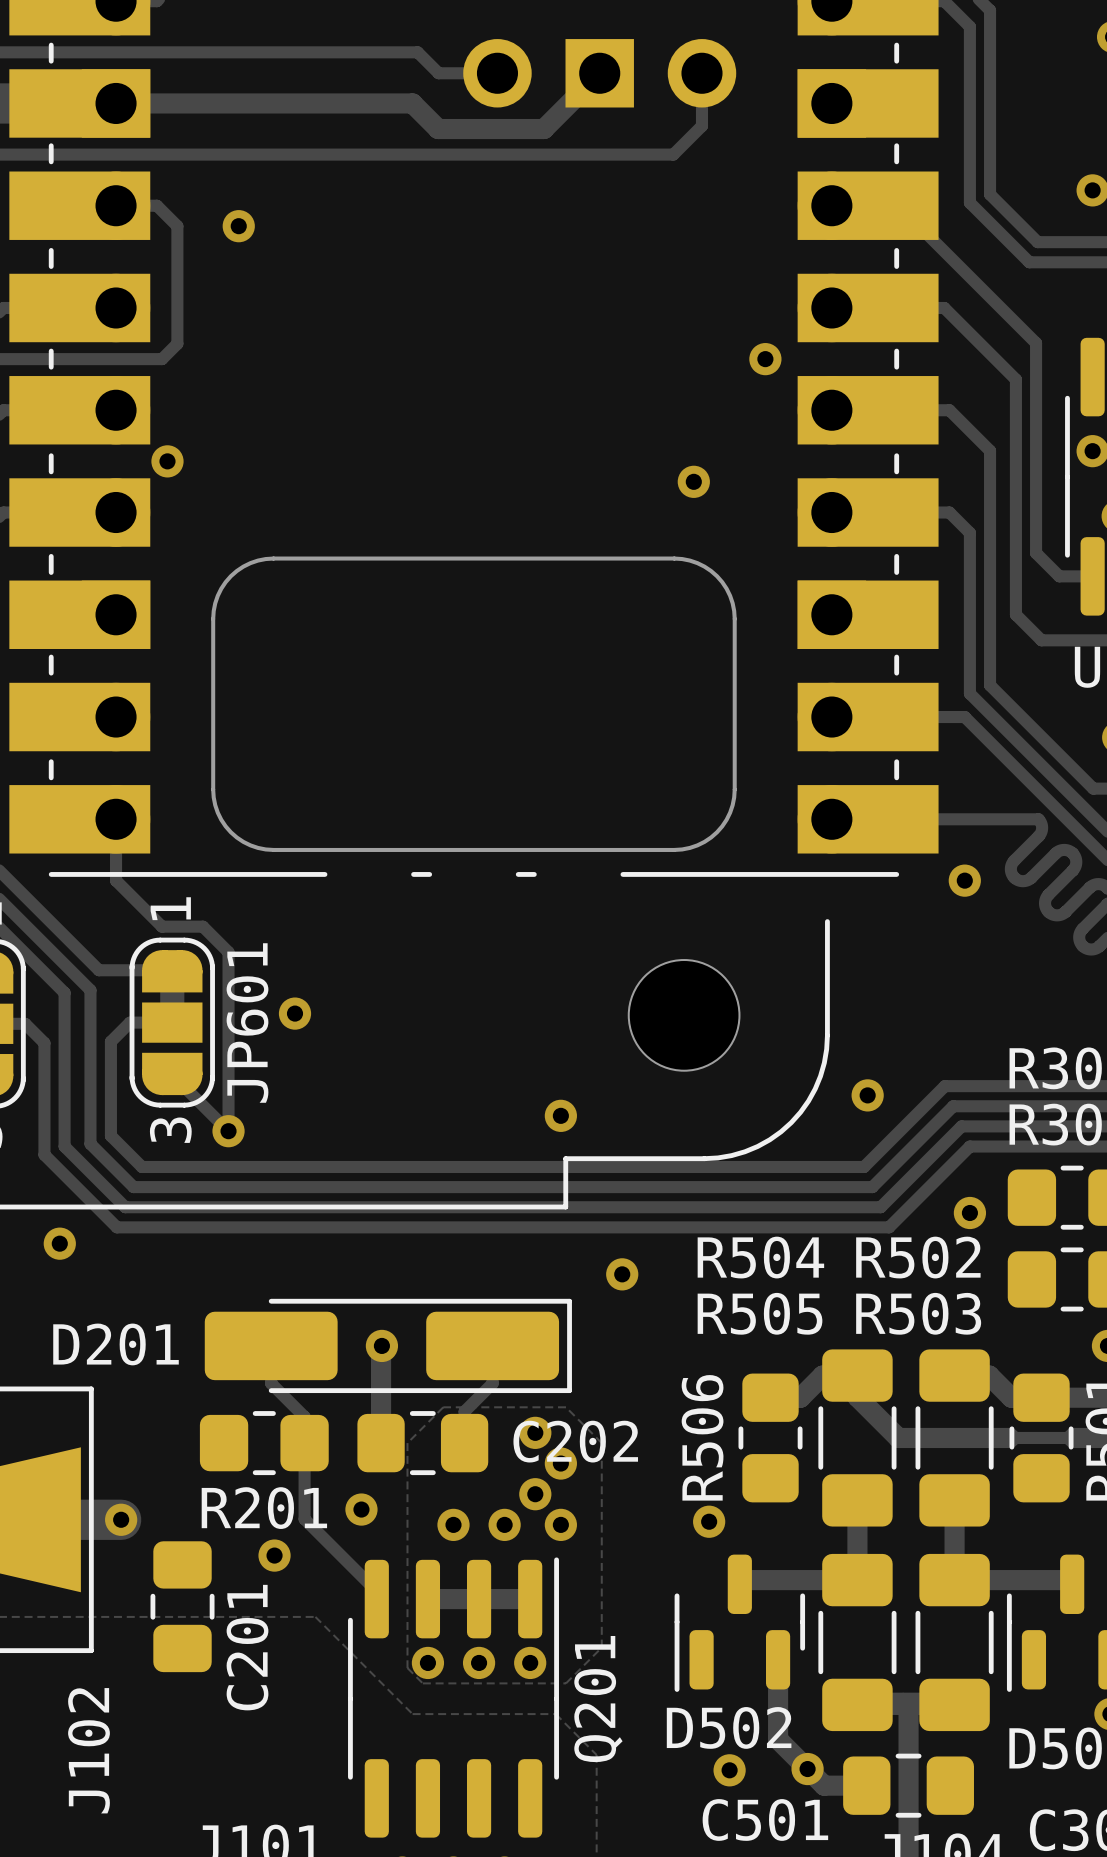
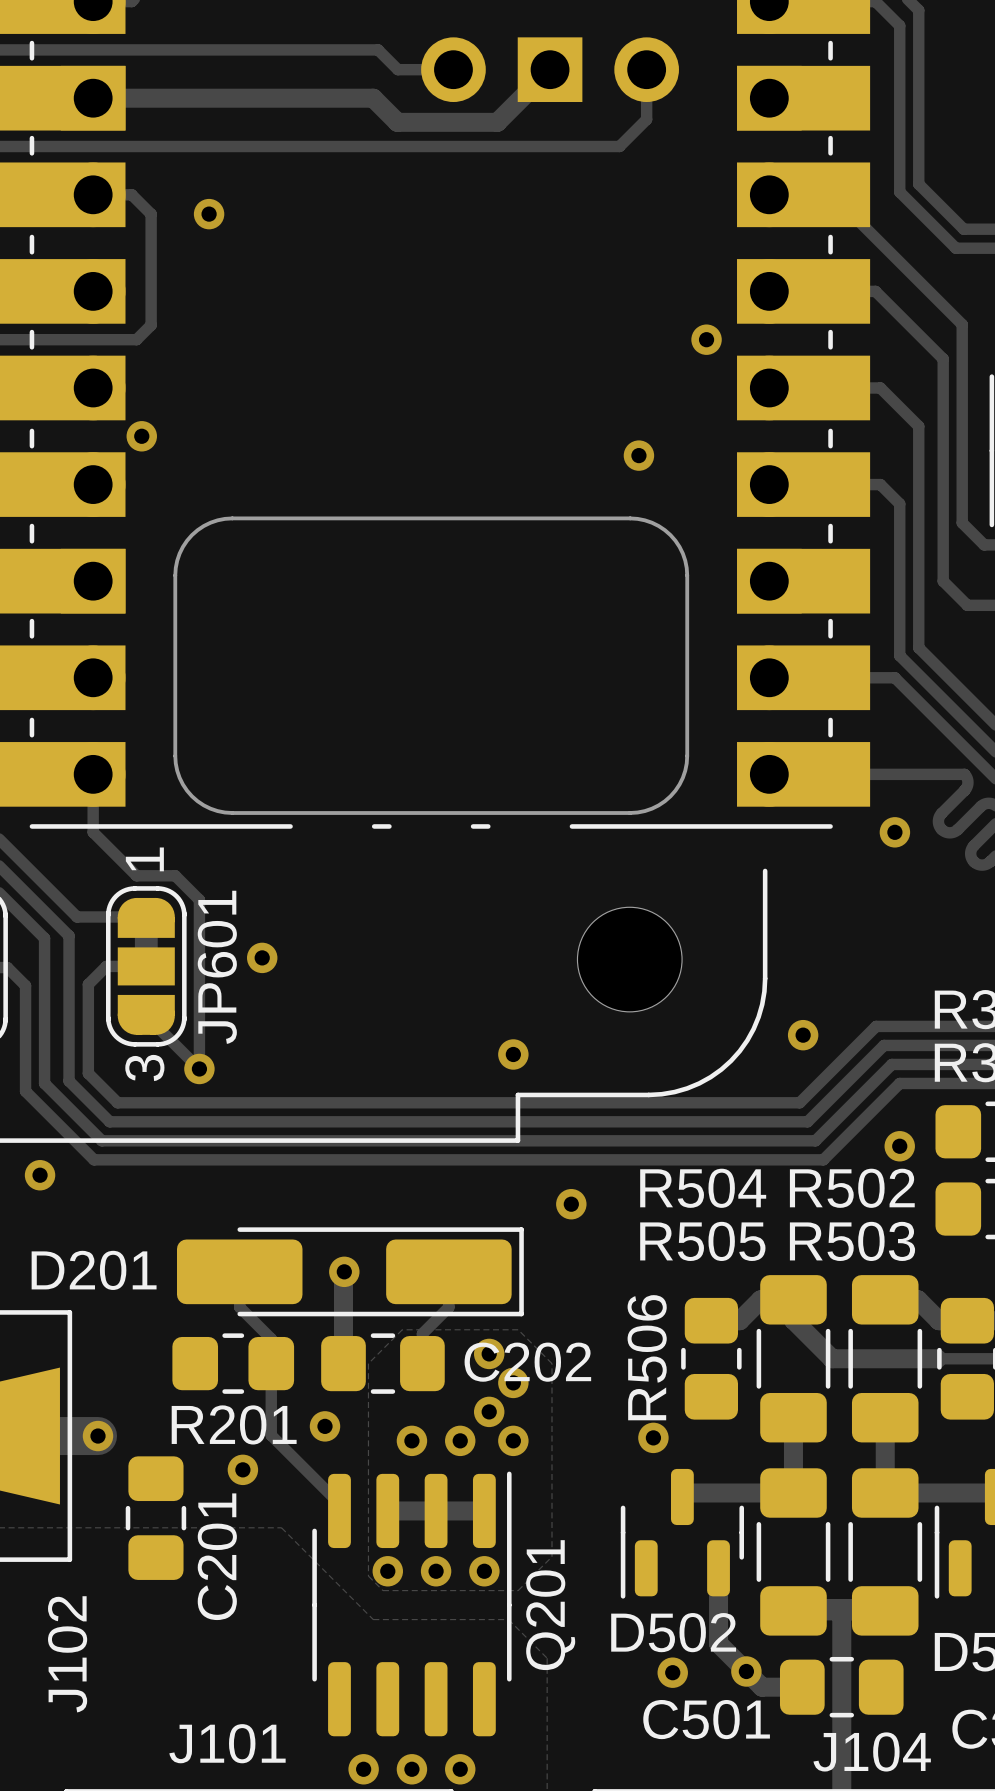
board edge: (273, 558) (674, 558) (689, 560) (704, 566) (717, 576) (726, 588) (734, 611) (734, 789) (732, 805) (726, 819) (717, 832) (704, 841) (689, 847) (674, 849) (273, 849) (257, 847) (243, 841) (225, 826) (217, 812) (213, 797) (213, 611) (221, 588) (230, 576) (250, 563) (273, 558) -> (232, 518) (210, 522) (191, 535) (179, 553) (175, 567) (175, 763) (179, 777) (187, 790) (203, 805) (217, 811) (232, 813) (630, 813) (644, 811) (658, 805) (670, 796) (679, 784) (685, 770) (687, 755) (686, 567) (682, 553) (675, 540) (658, 526) (644, 520) (630, 518) (232, 518)

